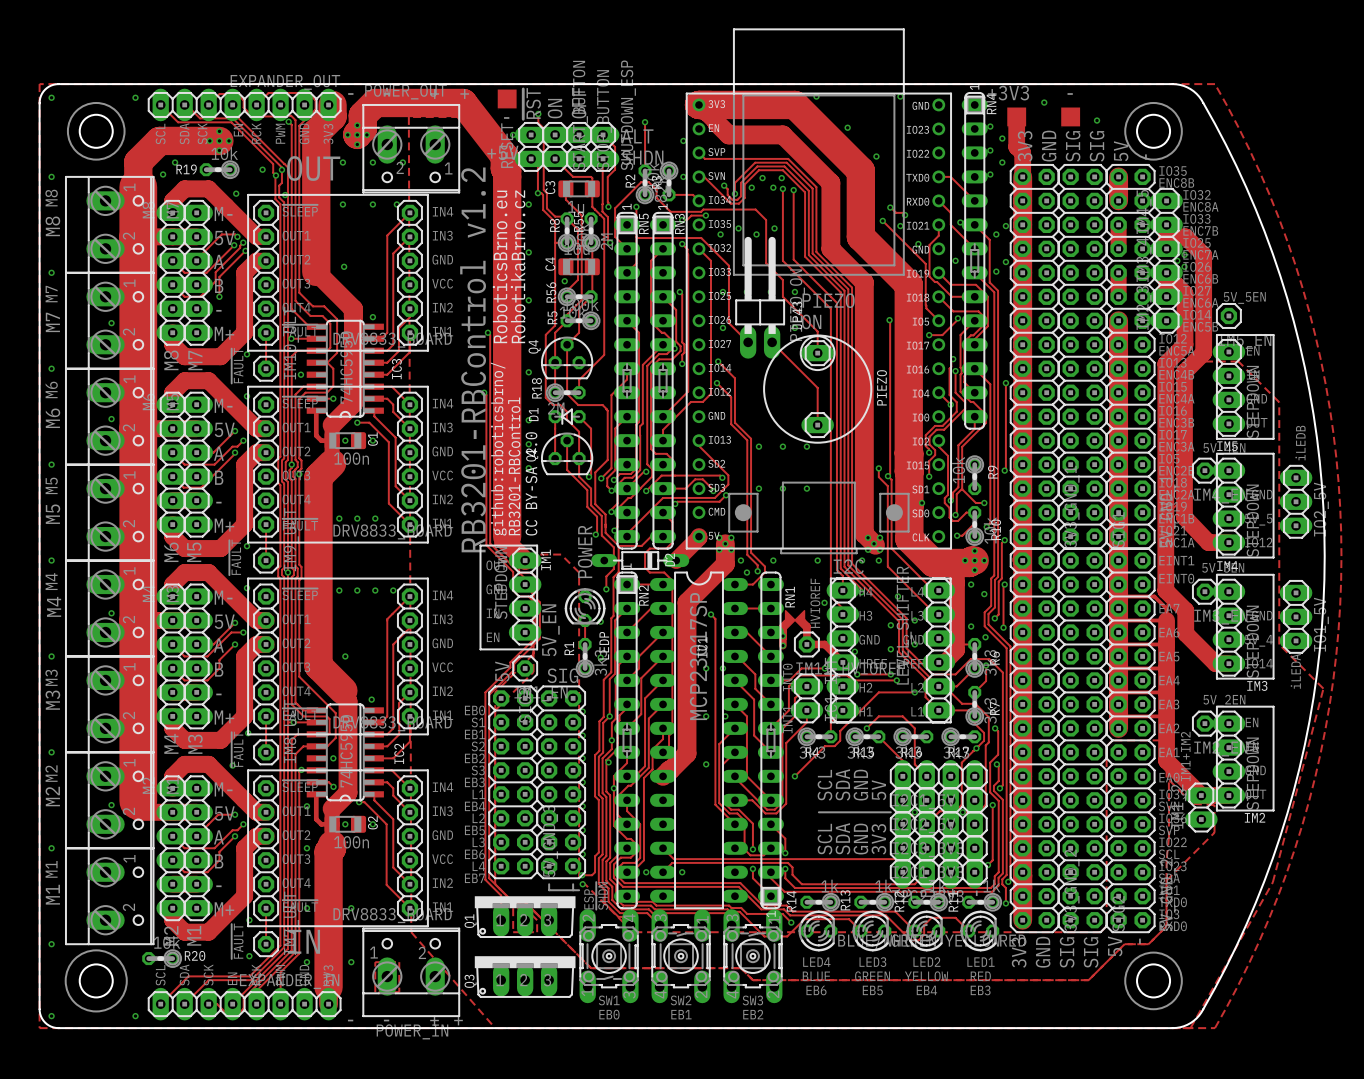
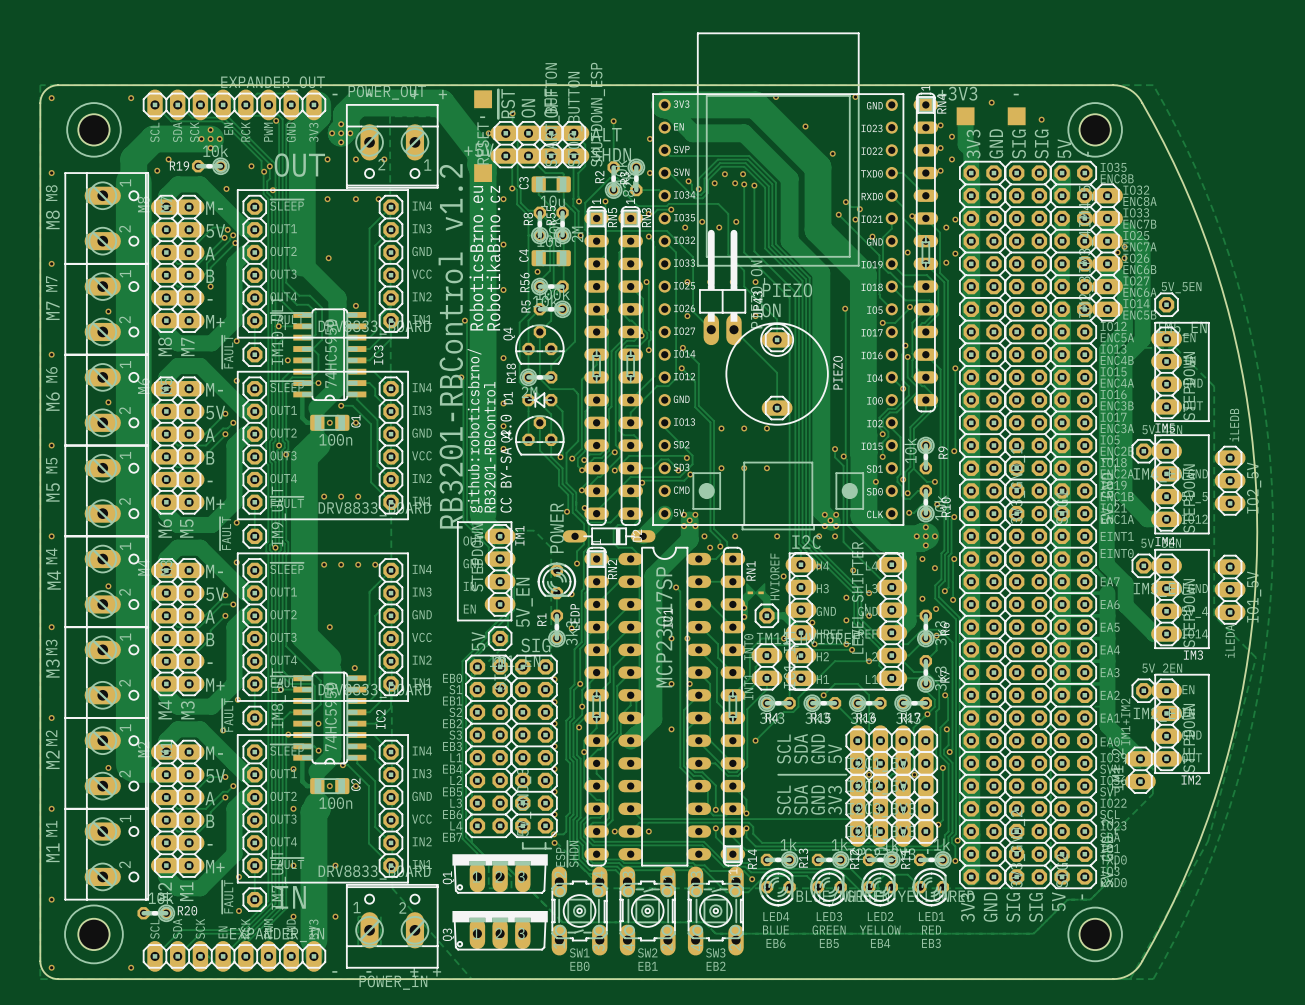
C3 value: 1u (576, 206) -> 10u (552, 201)

